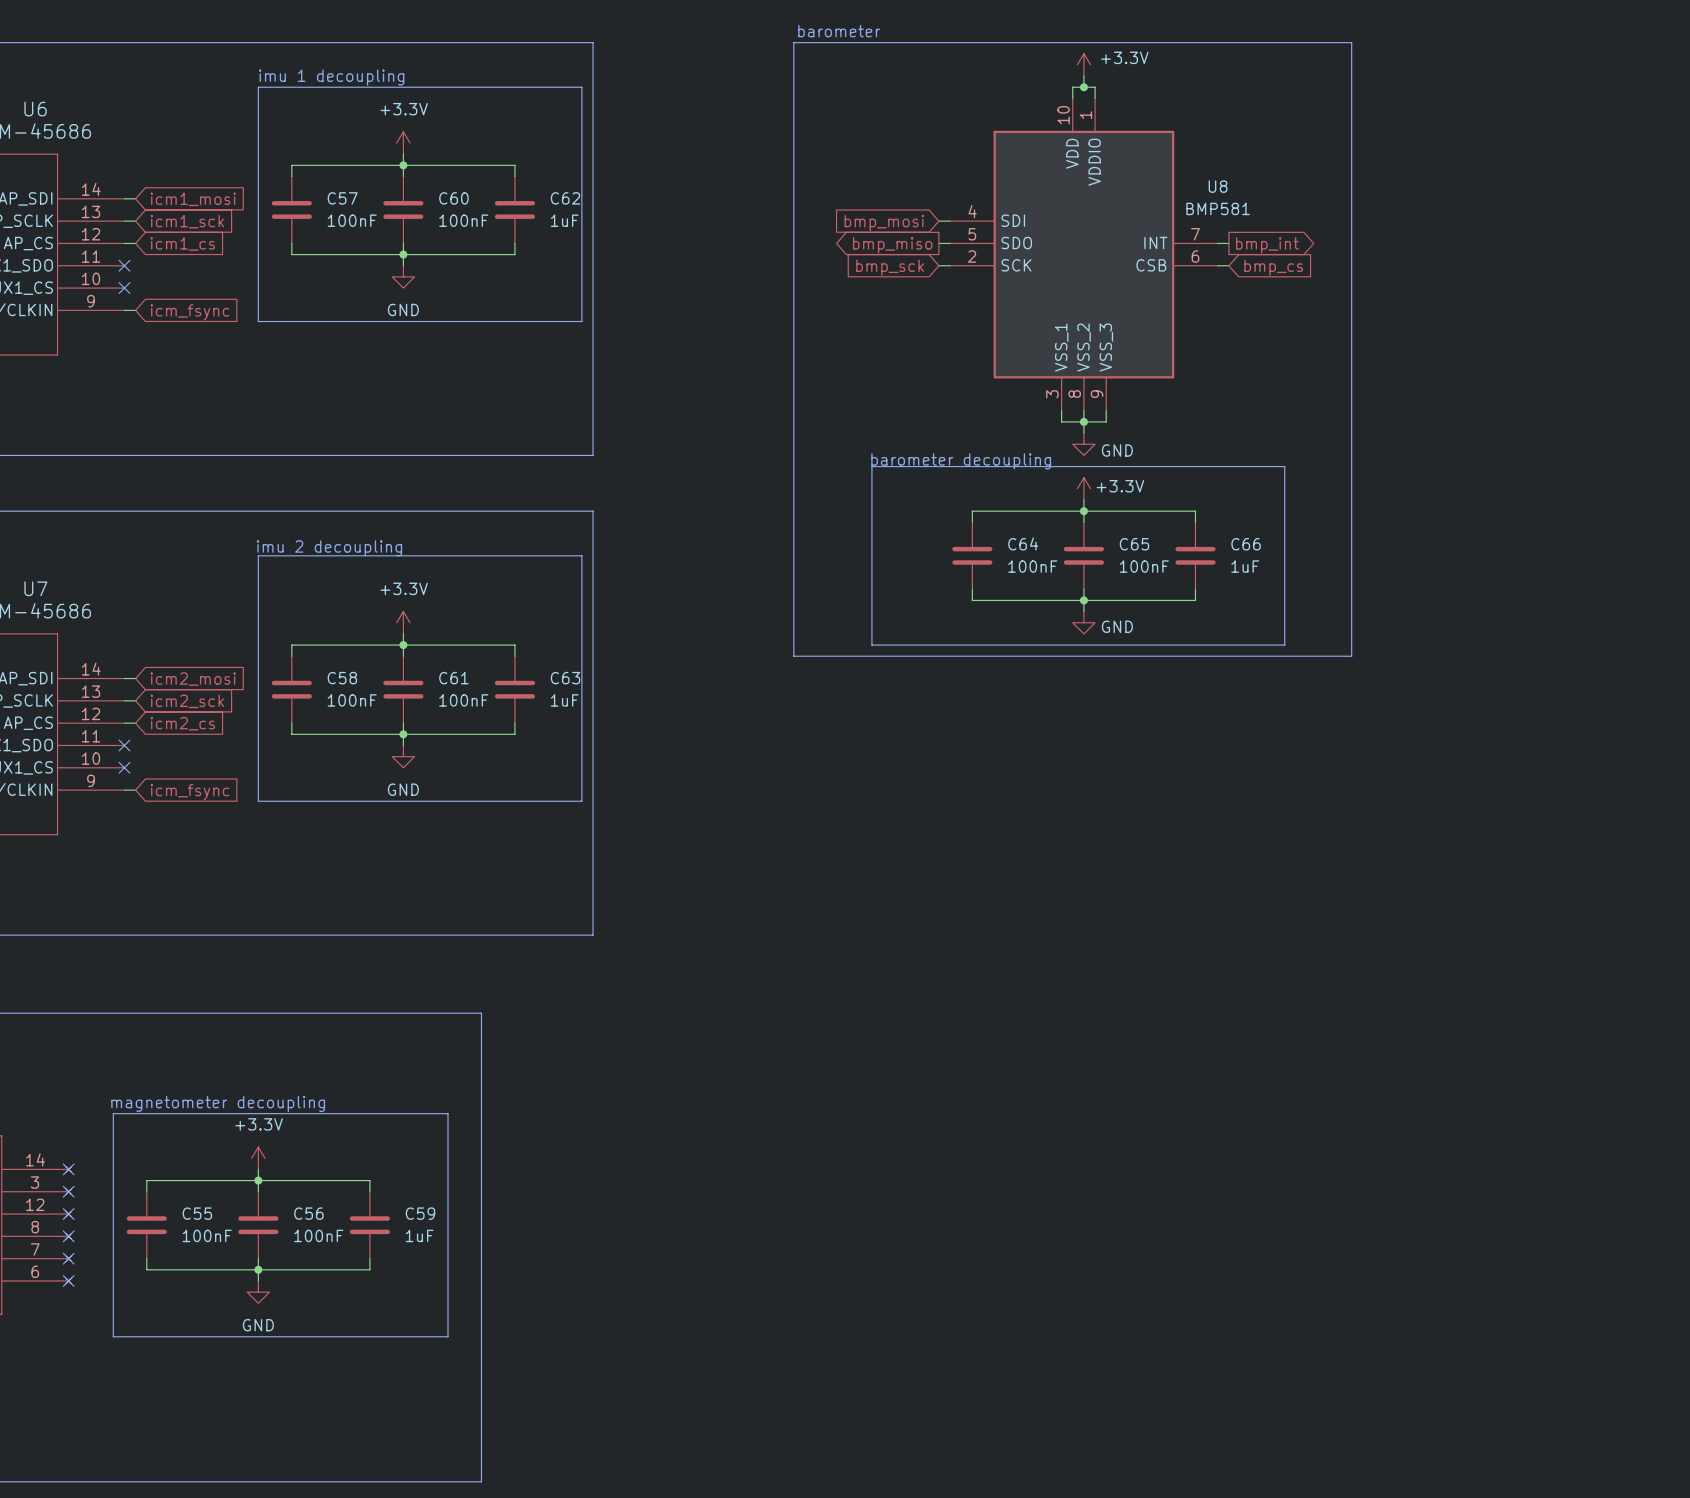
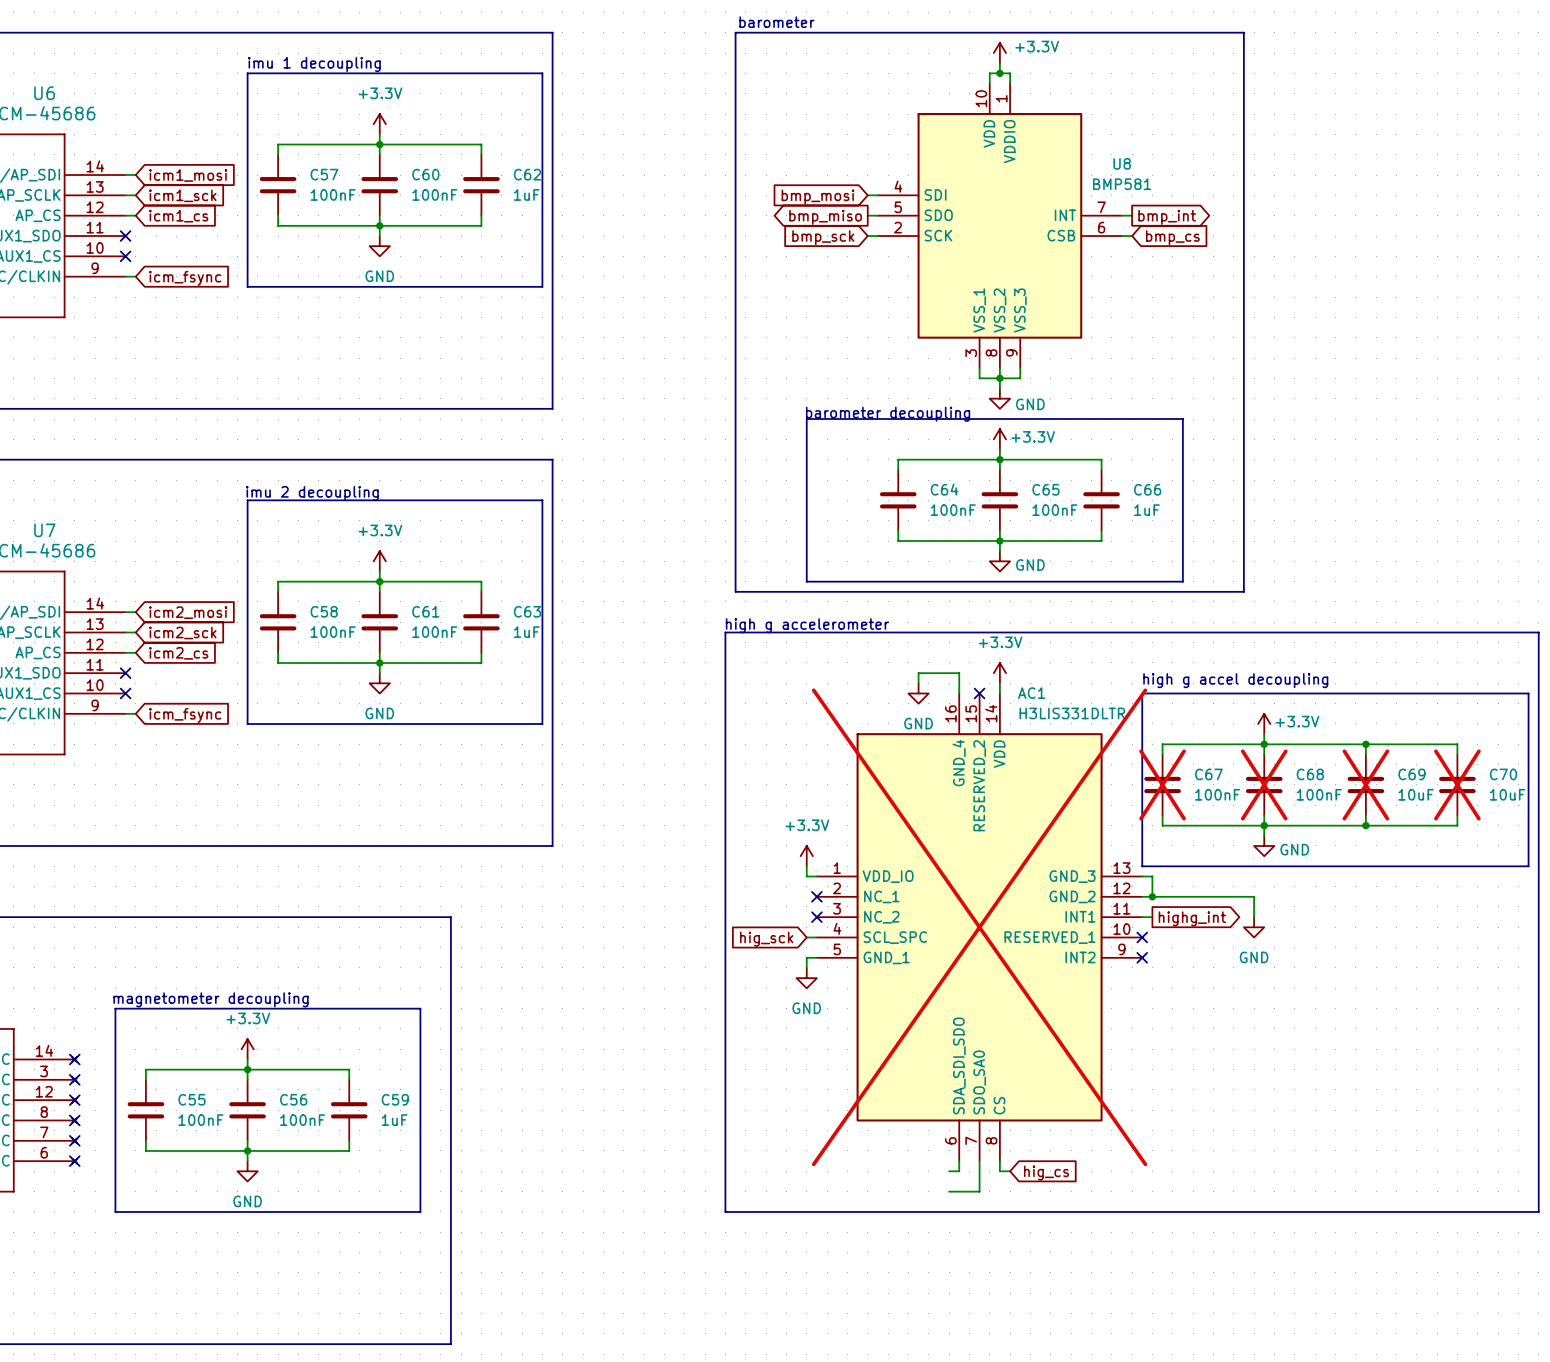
text: none -> high g accelerometer (807, 625)
line: none -> (725, 632) (1538, 632) (1538, 1211) (725, 1211) (725, 632)
power symbol: none -> +3.3V (999, 673)
text: none -> high g accel decoupling (1235, 680)
wire: none -> (918, 683) (918, 673) (959, 673) (959, 693)
wire: none -> (999, 683) (999, 693)
power symbol: none -> GND (918, 693)
no-connect mark: none -> (979, 693)
line: none -> (1142, 693) (1528, 693) (1528, 866) (1142, 866) (1142, 693)
power symbol: none -> +3.3V (1264, 723)
wire: none -> (1264, 734) (1264, 754)
junction: none -> (1264, 744)
wire: none -> (1365, 744) (1365, 754)
junction: none -> (1365, 744)
wire: none -> (1162, 754) (1162, 744) (1457, 744) (1457, 754)
C67: none -> 100nF (1162, 784)
C68: none -> 100nF (1264, 784)
C69: none -> 10uF (1365, 784)
C70: none -> 10uF (1457, 784)
wire: none -> (1162, 815) (1162, 825) (1457, 825) (1457, 815)
wire: none -> (1264, 815) (1264, 835)
wire: none -> (1365, 815) (1365, 825)
junction: none -> (1264, 825)
junction: none -> (1365, 825)
power symbol: none -> GND (1264, 845)
power symbol: none -> +3.3V (806, 856)
wire: none -> (806, 866) (806, 876) (816, 876)
wire: none -> (1142, 876) (1152, 876) (1152, 896)
no-connect mark: none -> (816, 896)
wire: none -> (1142, 896) (1254, 896) (1254, 917)
junction: none -> (1152, 896)
no-connect mark: none -> (816, 917)
wire: none -> (1142, 917) (1152, 917)
global label: none -> highg_int (1192, 918)
AC1: none -> H3LIS331DLTR (979, 927)
power symbol: none -> GND (1254, 927)
wire: none -> (806, 937) (816, 937)
no-connect mark: none -> (1142, 937)
global label: none -> hig_sck (766, 939)
wire: none -> (816, 957) (806, 957) (806, 967)
no-connect mark: none -> (1142, 957)
power symbol: none -> GND (806, 978)
wire: none -> (959, 1161) (959, 1171) (949, 1171)
wire: none -> (979, 1161) (979, 1191) (949, 1191)
wire: none -> (999, 1161) (999, 1171) (1010, 1171)
global label: none -> hig_cs (1046, 1173)

